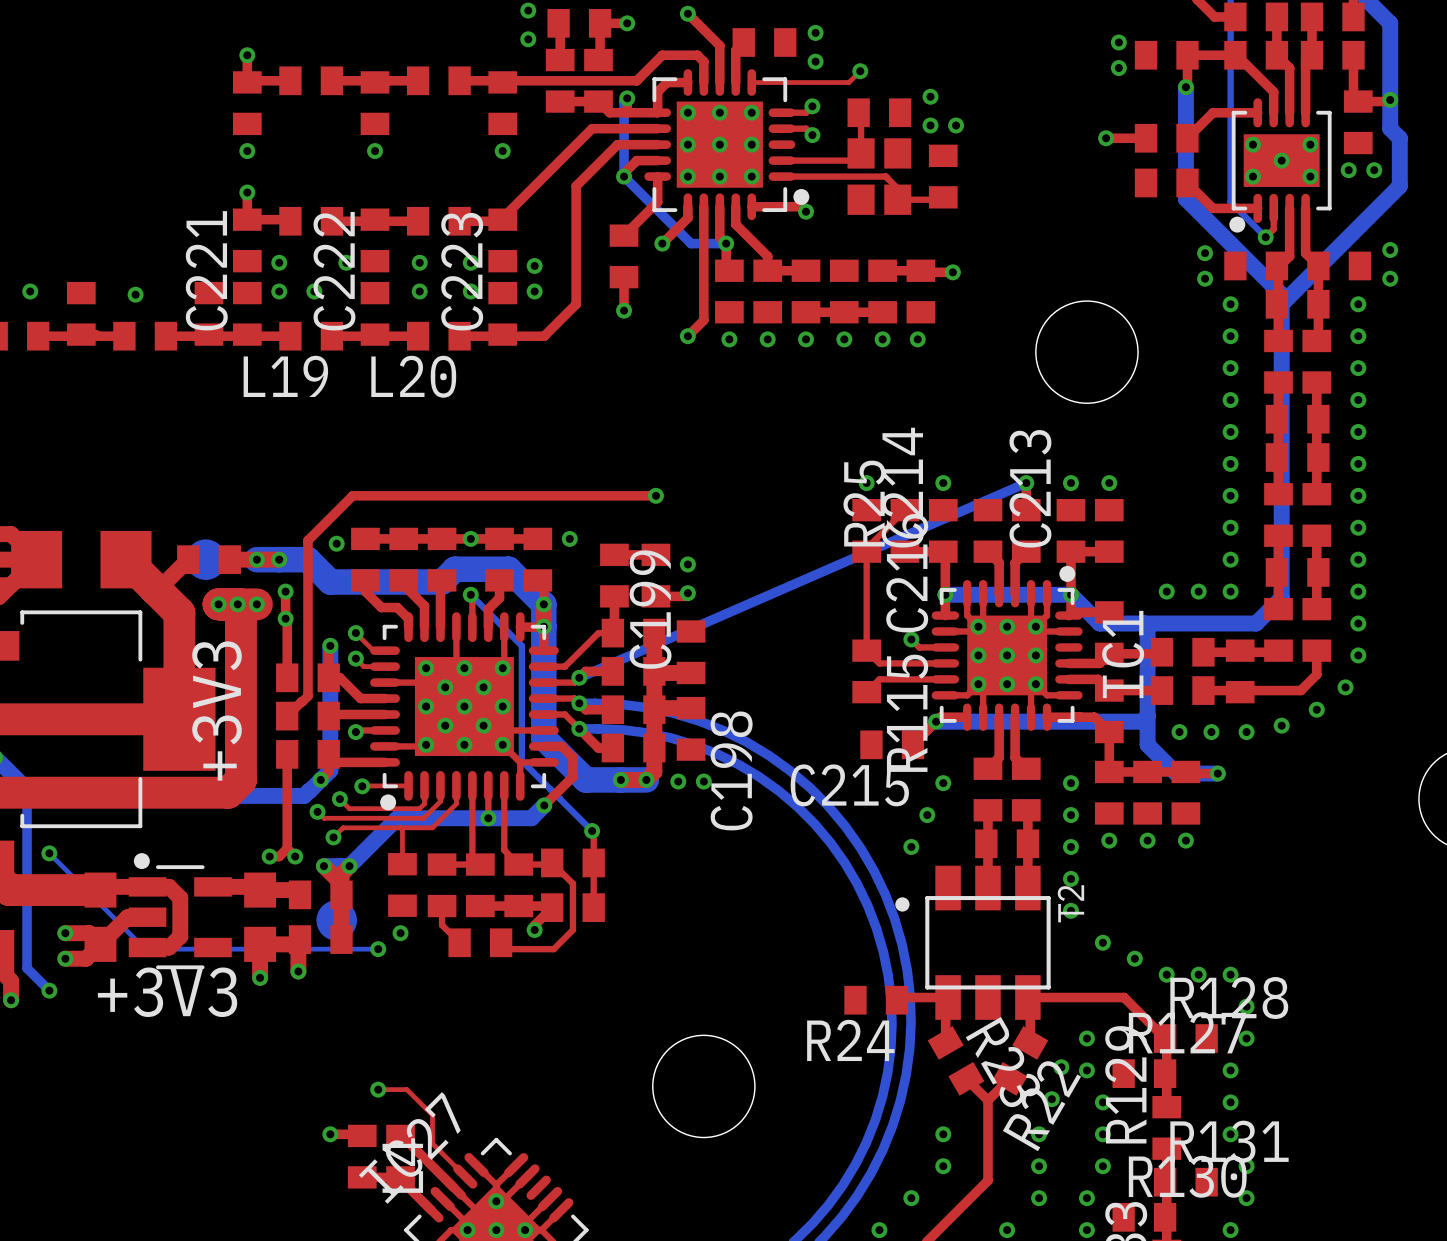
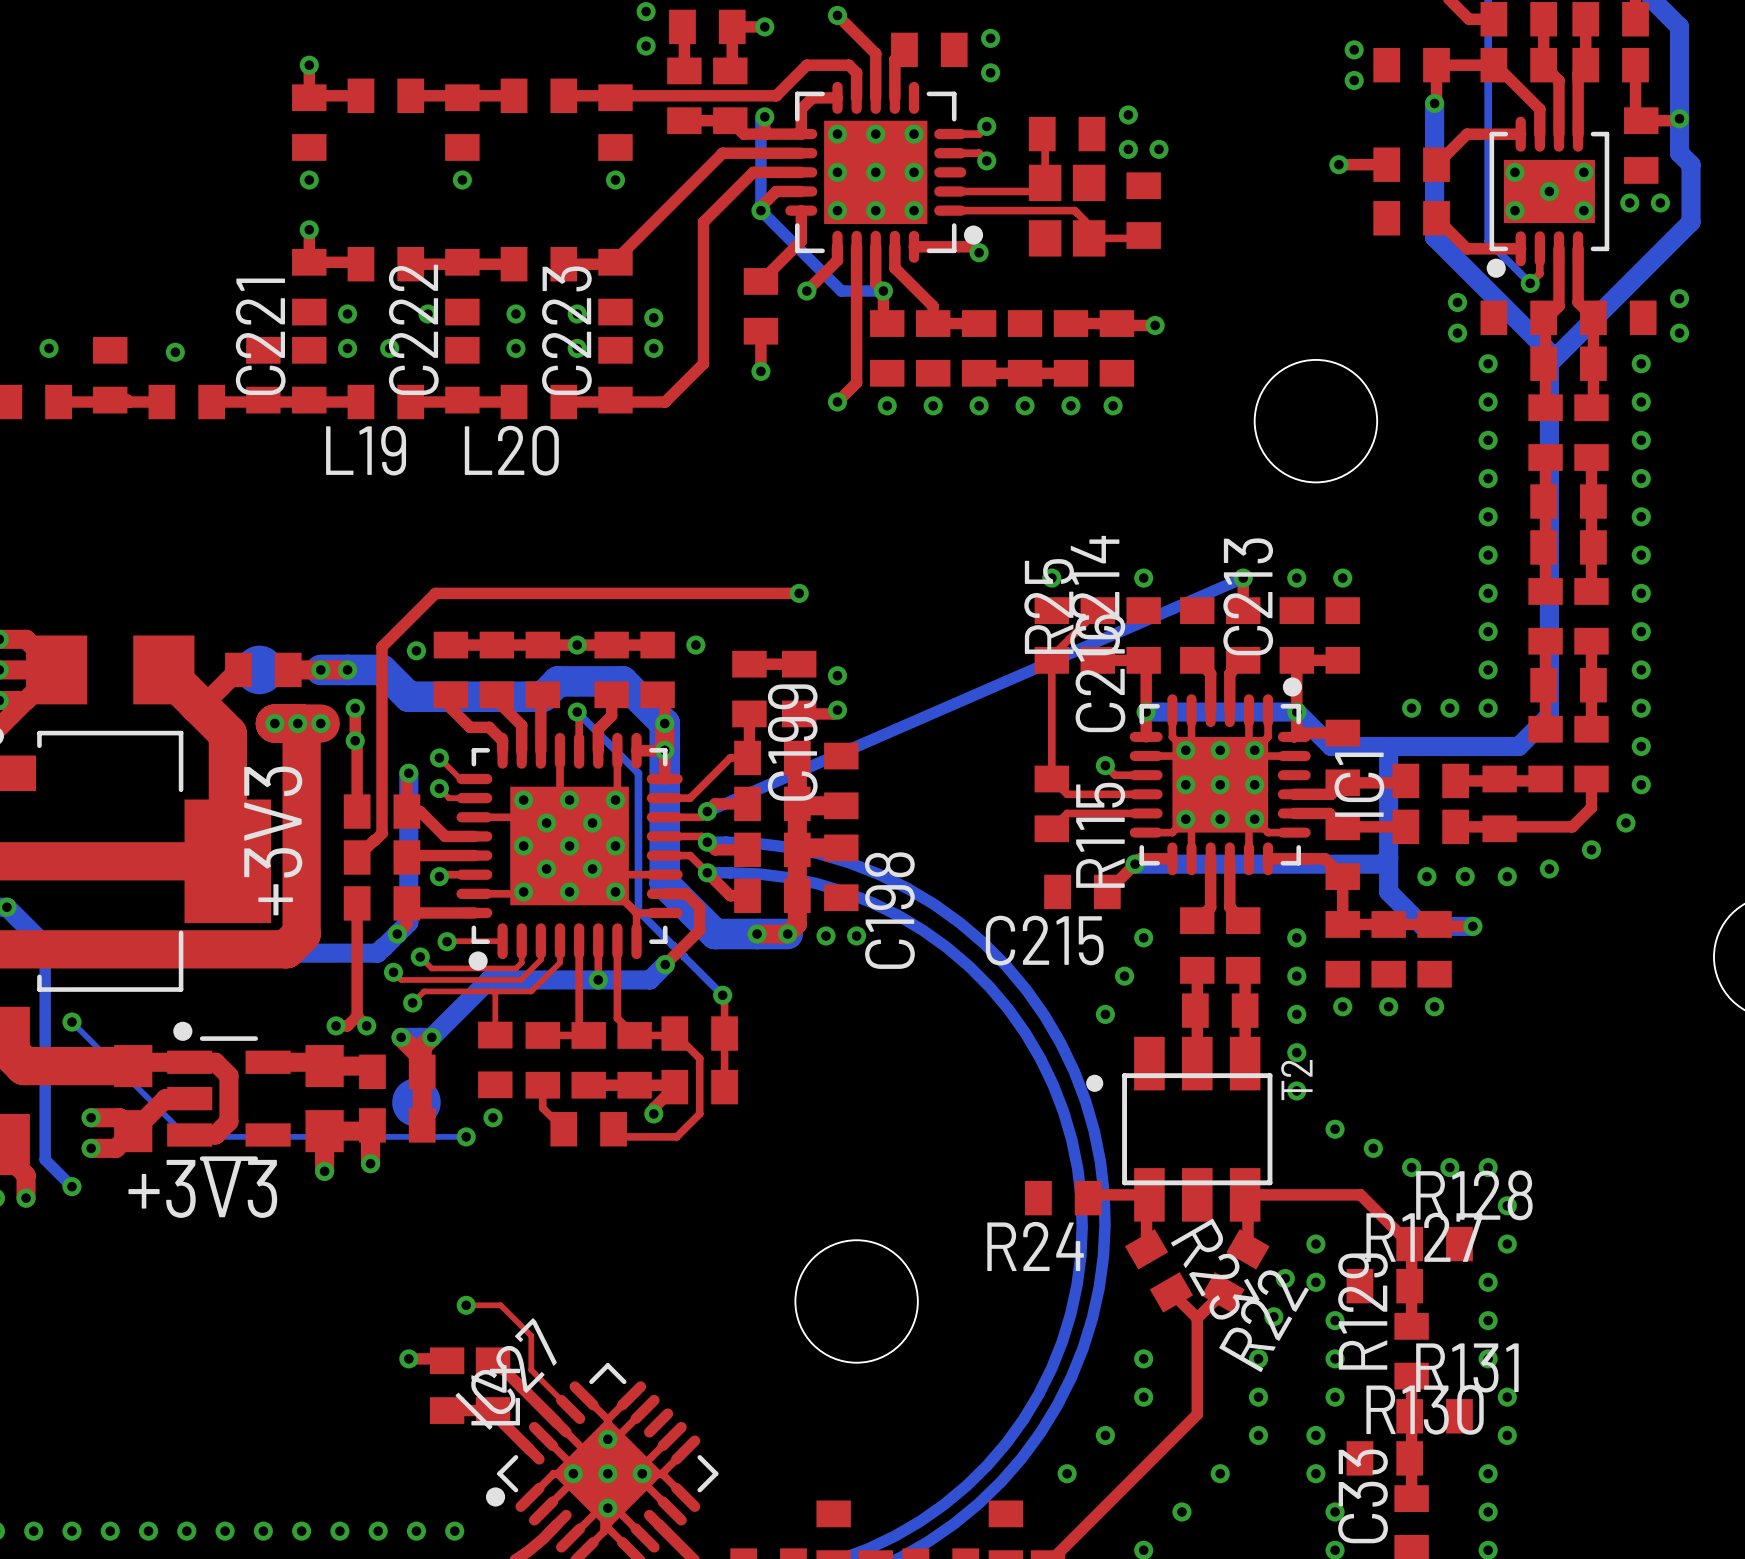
top track: (860, 71) (848, 82) (751, 82) -> none
via: (860, 71) -> none

